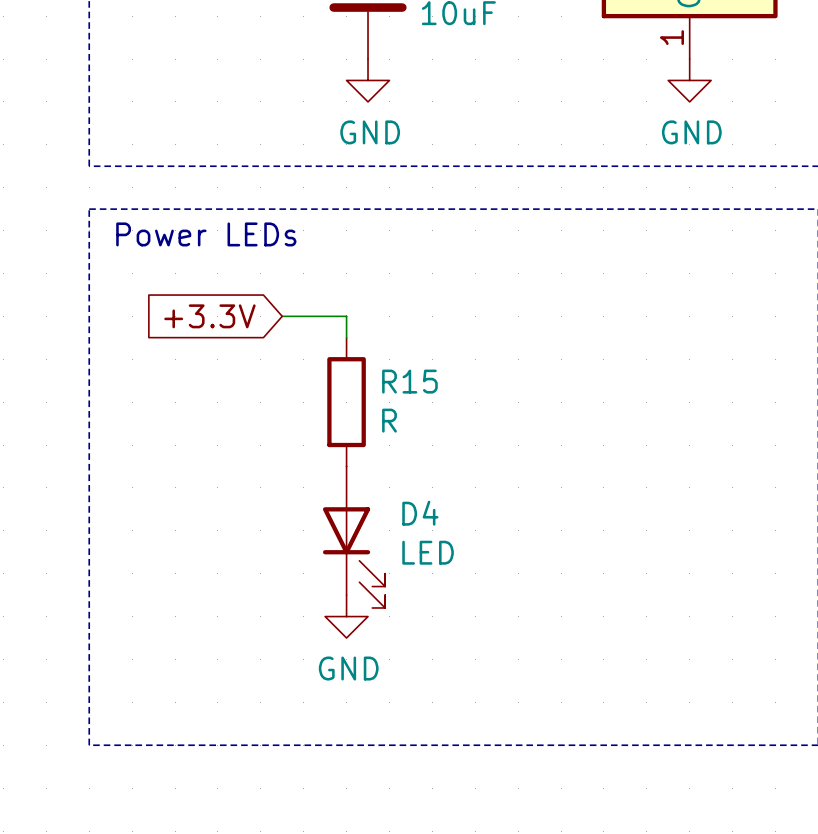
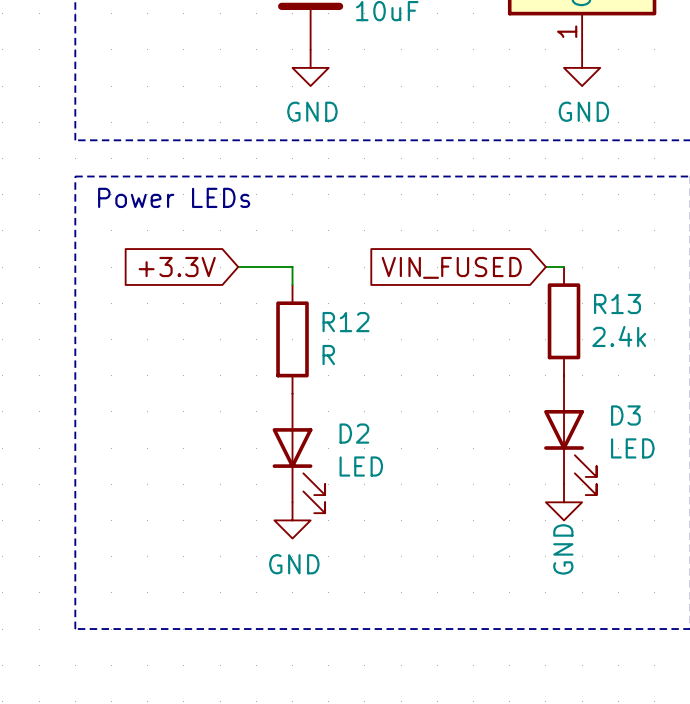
wire: none -> (545, 267) (564, 267)
global label: none -> VIN_FUSED (451, 267)
R13: none -> 2.4k (564, 321)
R15 name: R15 (409, 381) -> R12 (346, 322)
D4 name: D4 (420, 513) -> D2 (354, 433)
D3: none -> LED (570, 435)
power symbol: none -> GND (564, 502)

